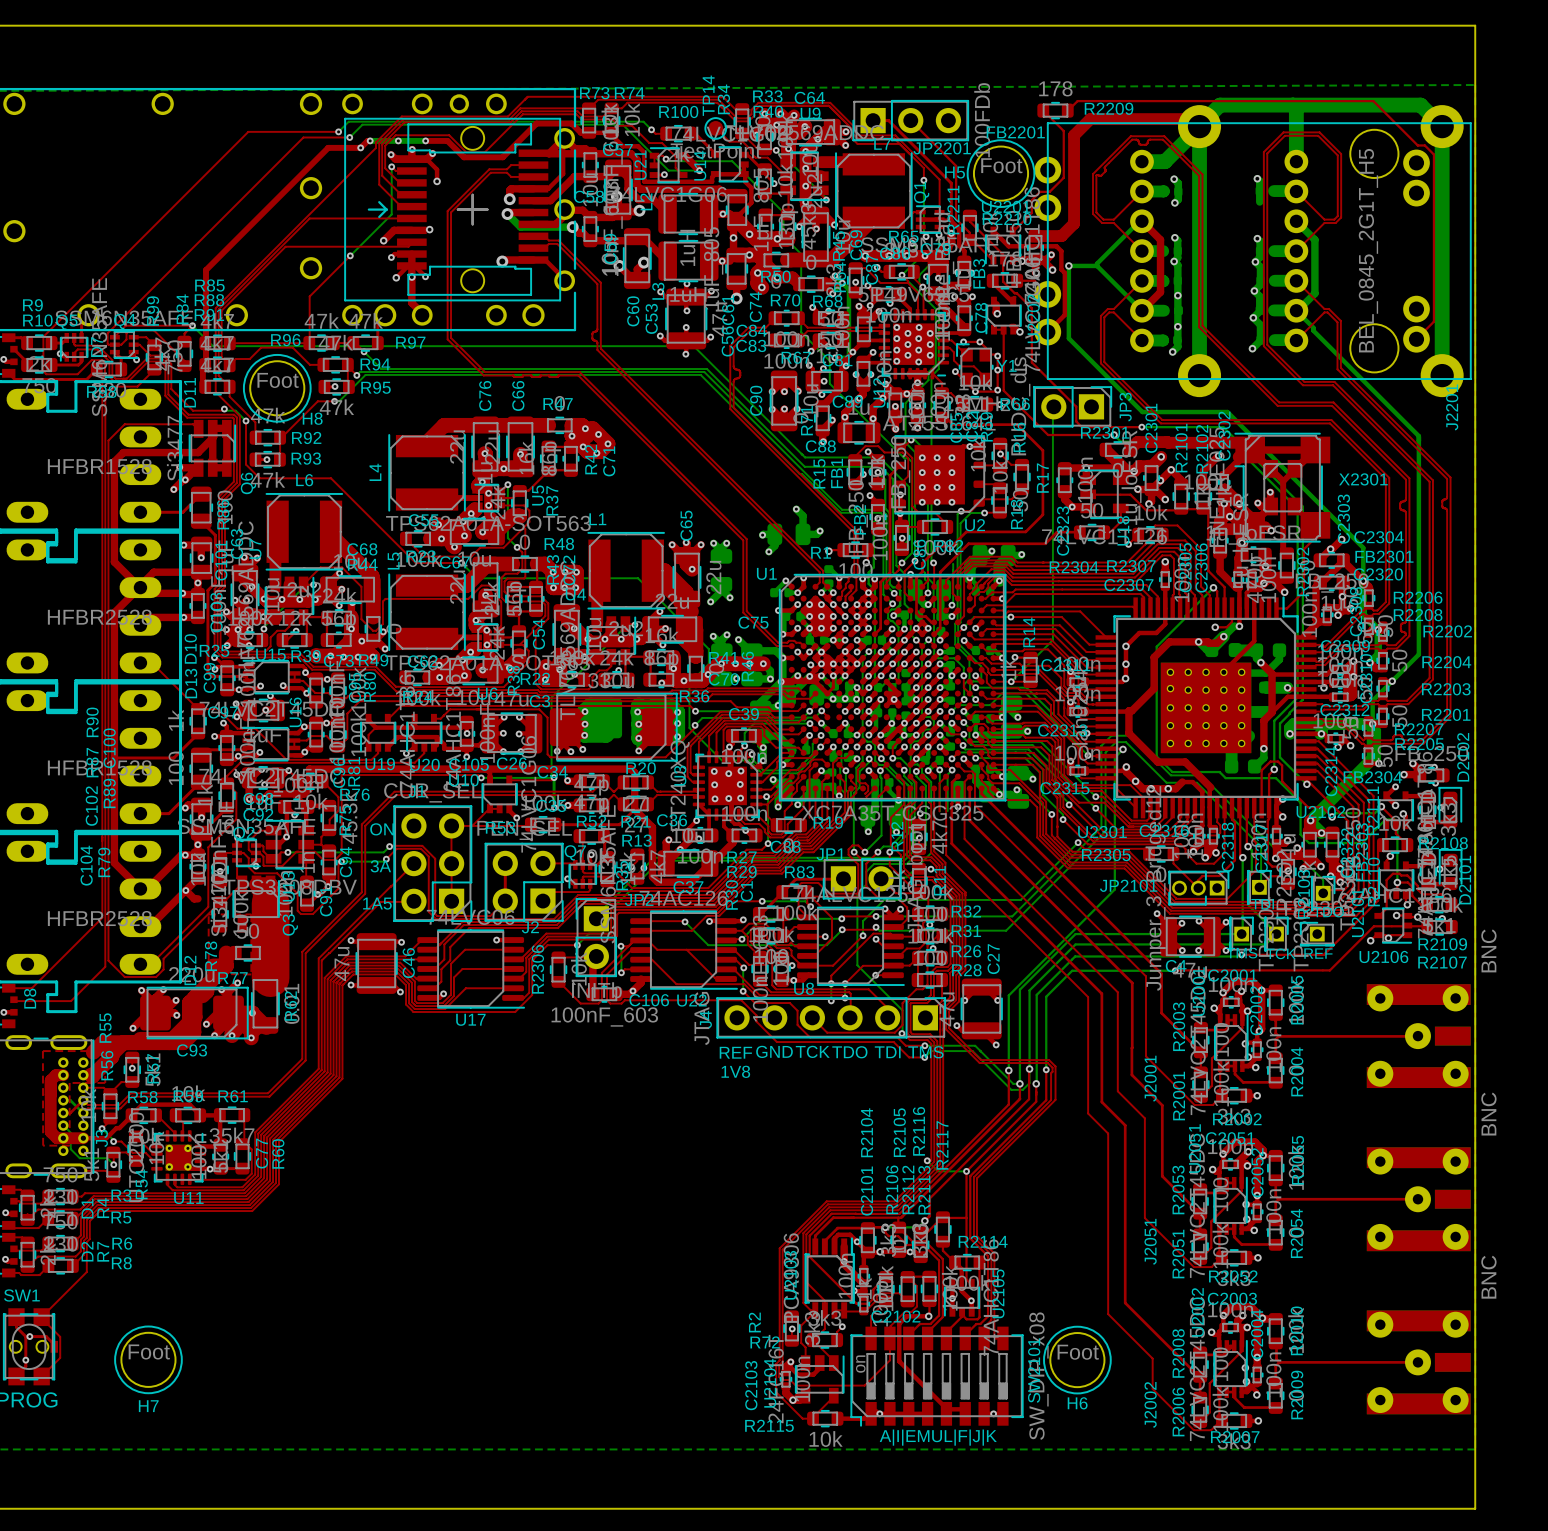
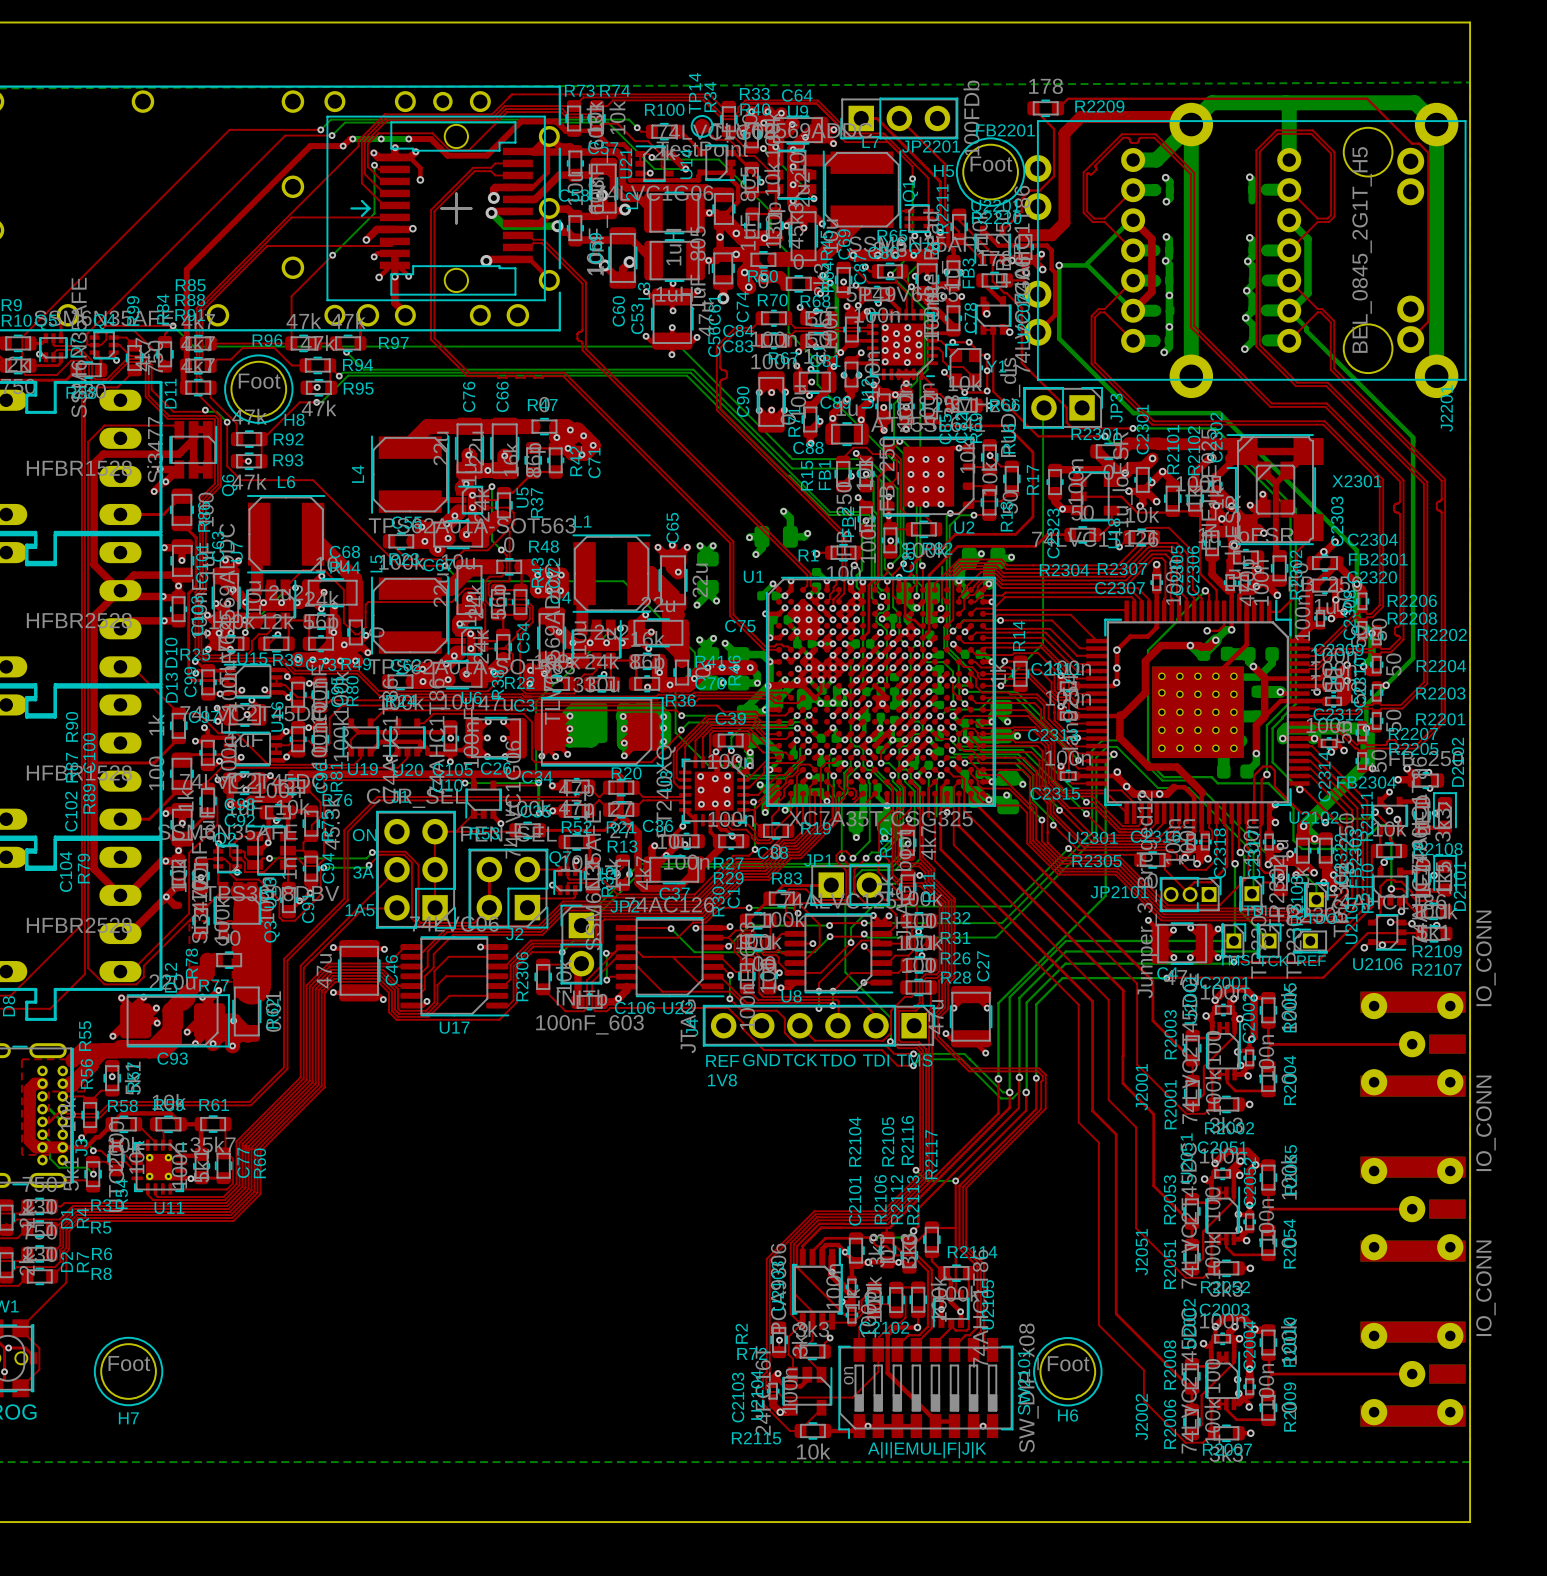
J2001 value: BNC (1488, 950) -> IO_CONN (1485, 958)
J2051 value: BNC (1488, 1114) -> IO_CONN (1485, 1123)
J2002 value: BNC (1488, 1277) -> IO_CONN (1485, 1288)

